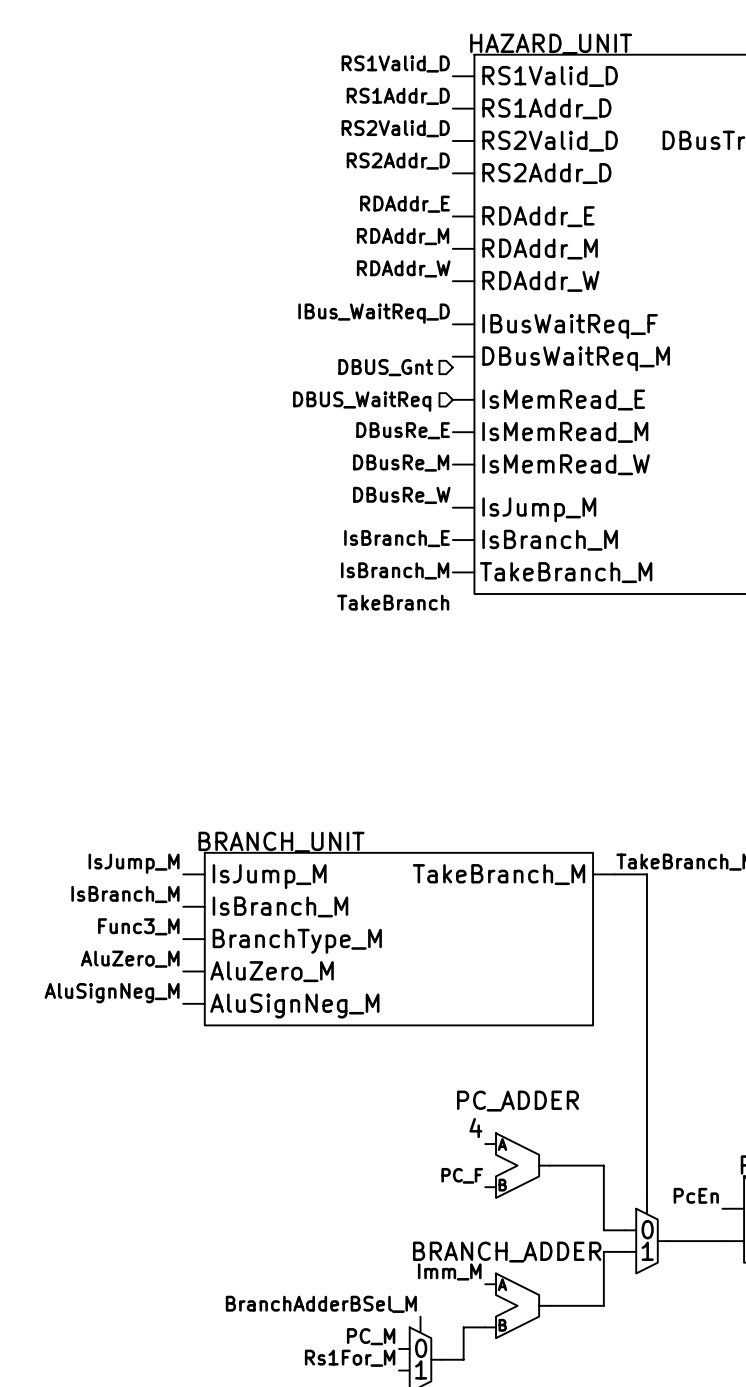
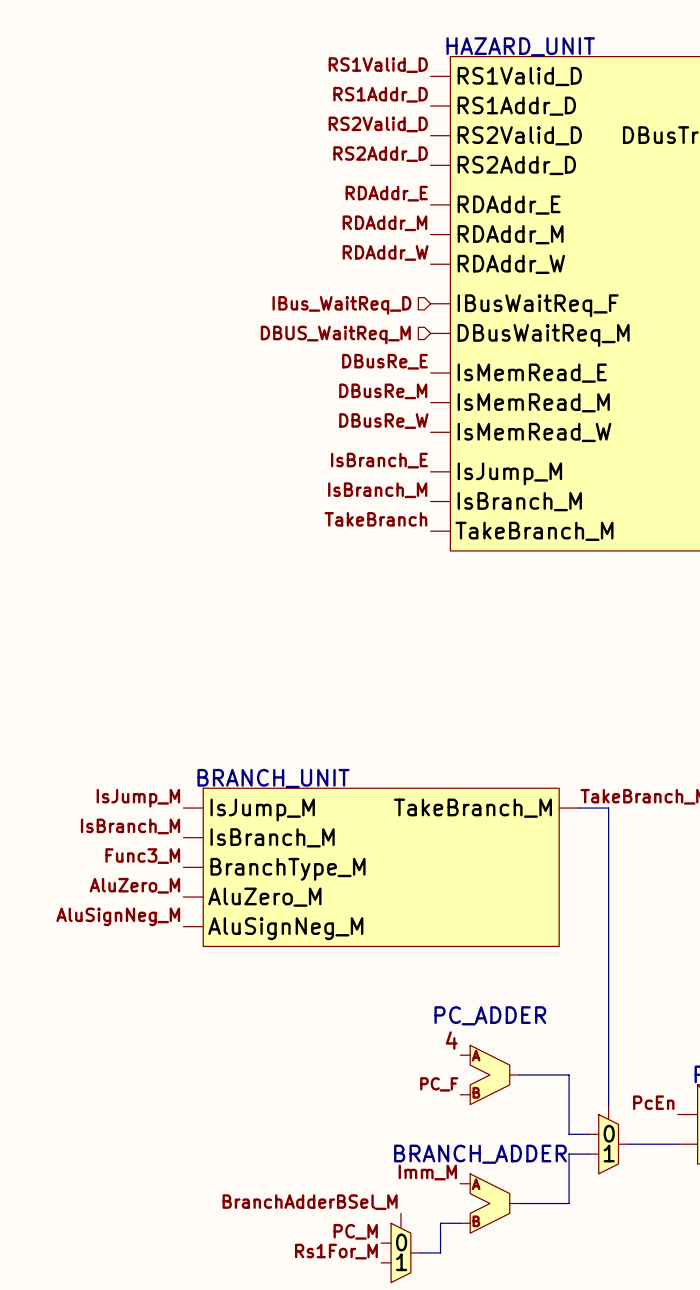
label: IBus_WaitReq_D (374, 313) -> none
hierarchical label: none -> IBus_WaitReq_D (341, 305)
hierarchical label: DBUS_Gnt (385, 367) -> DBUS_WaitReq_M (335, 335)
hierarchical label: DBUS_WaitReq (362, 401) -> none
label position: DBusRe_E (403, 430) -> DBusRe_E (385, 361)
label: none -> DBusRe_W (383, 421)
label position: DBusRe_M (401, 463) -> DBusRe_M (383, 391)
label: DBusRe_W (401, 495) -> IsBranch_E (379, 460)
label: IsBranch_E (397, 538) -> none
label position: IsBranch_M (395, 570) -> IsBranch_M (377, 490)
label position: TakeBranch (393, 602) -> TakeBranch (375, 519)

